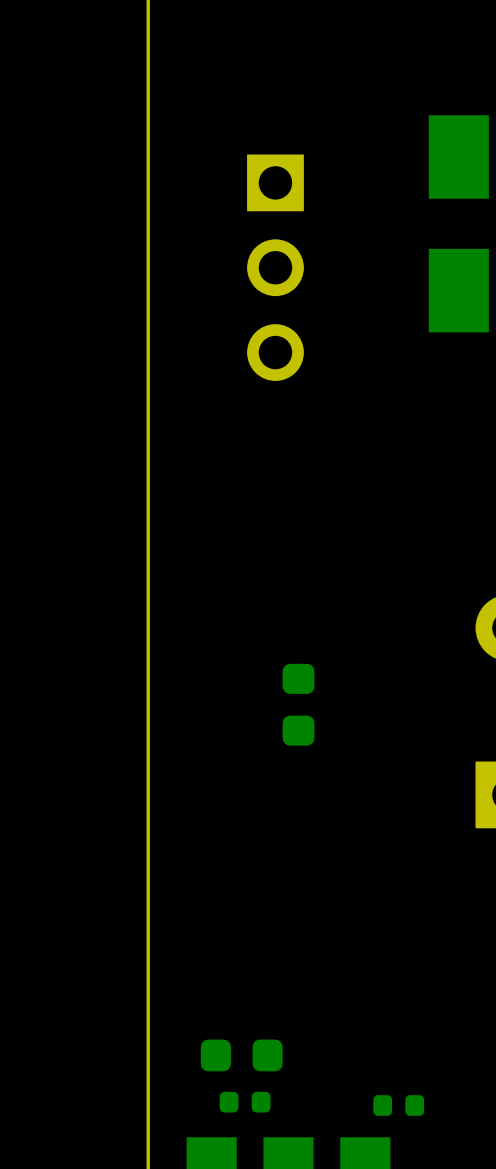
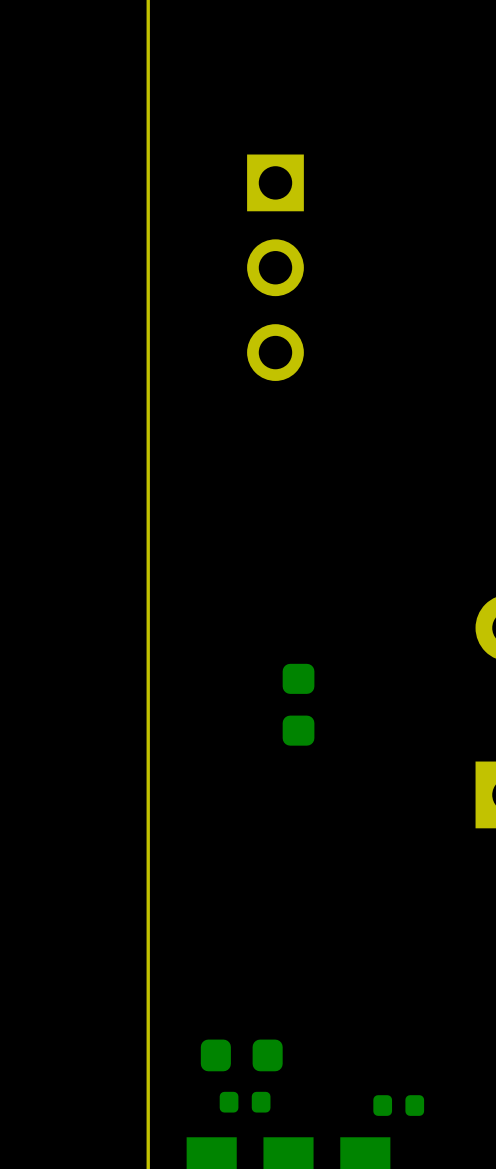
part: (458, 223) -> none

